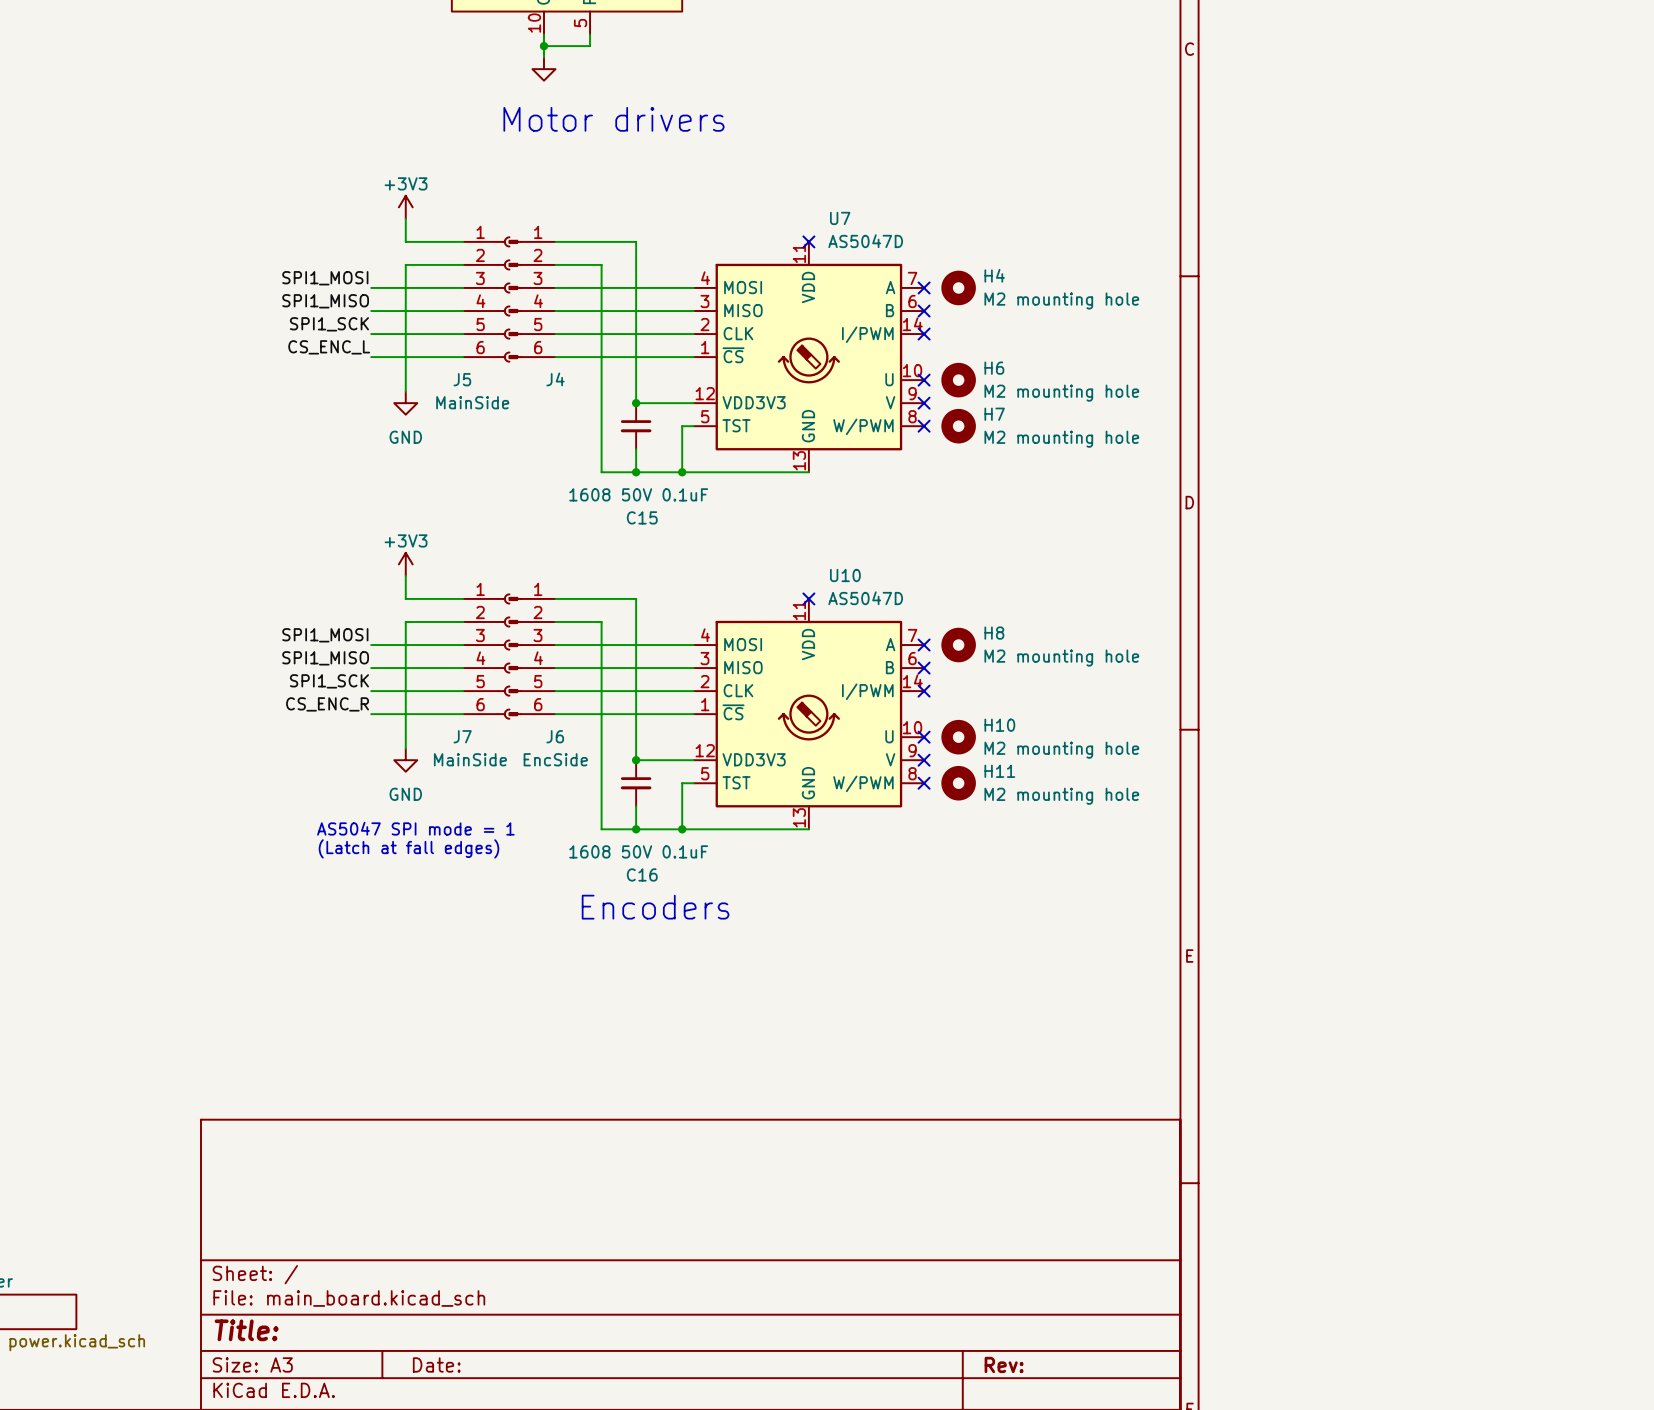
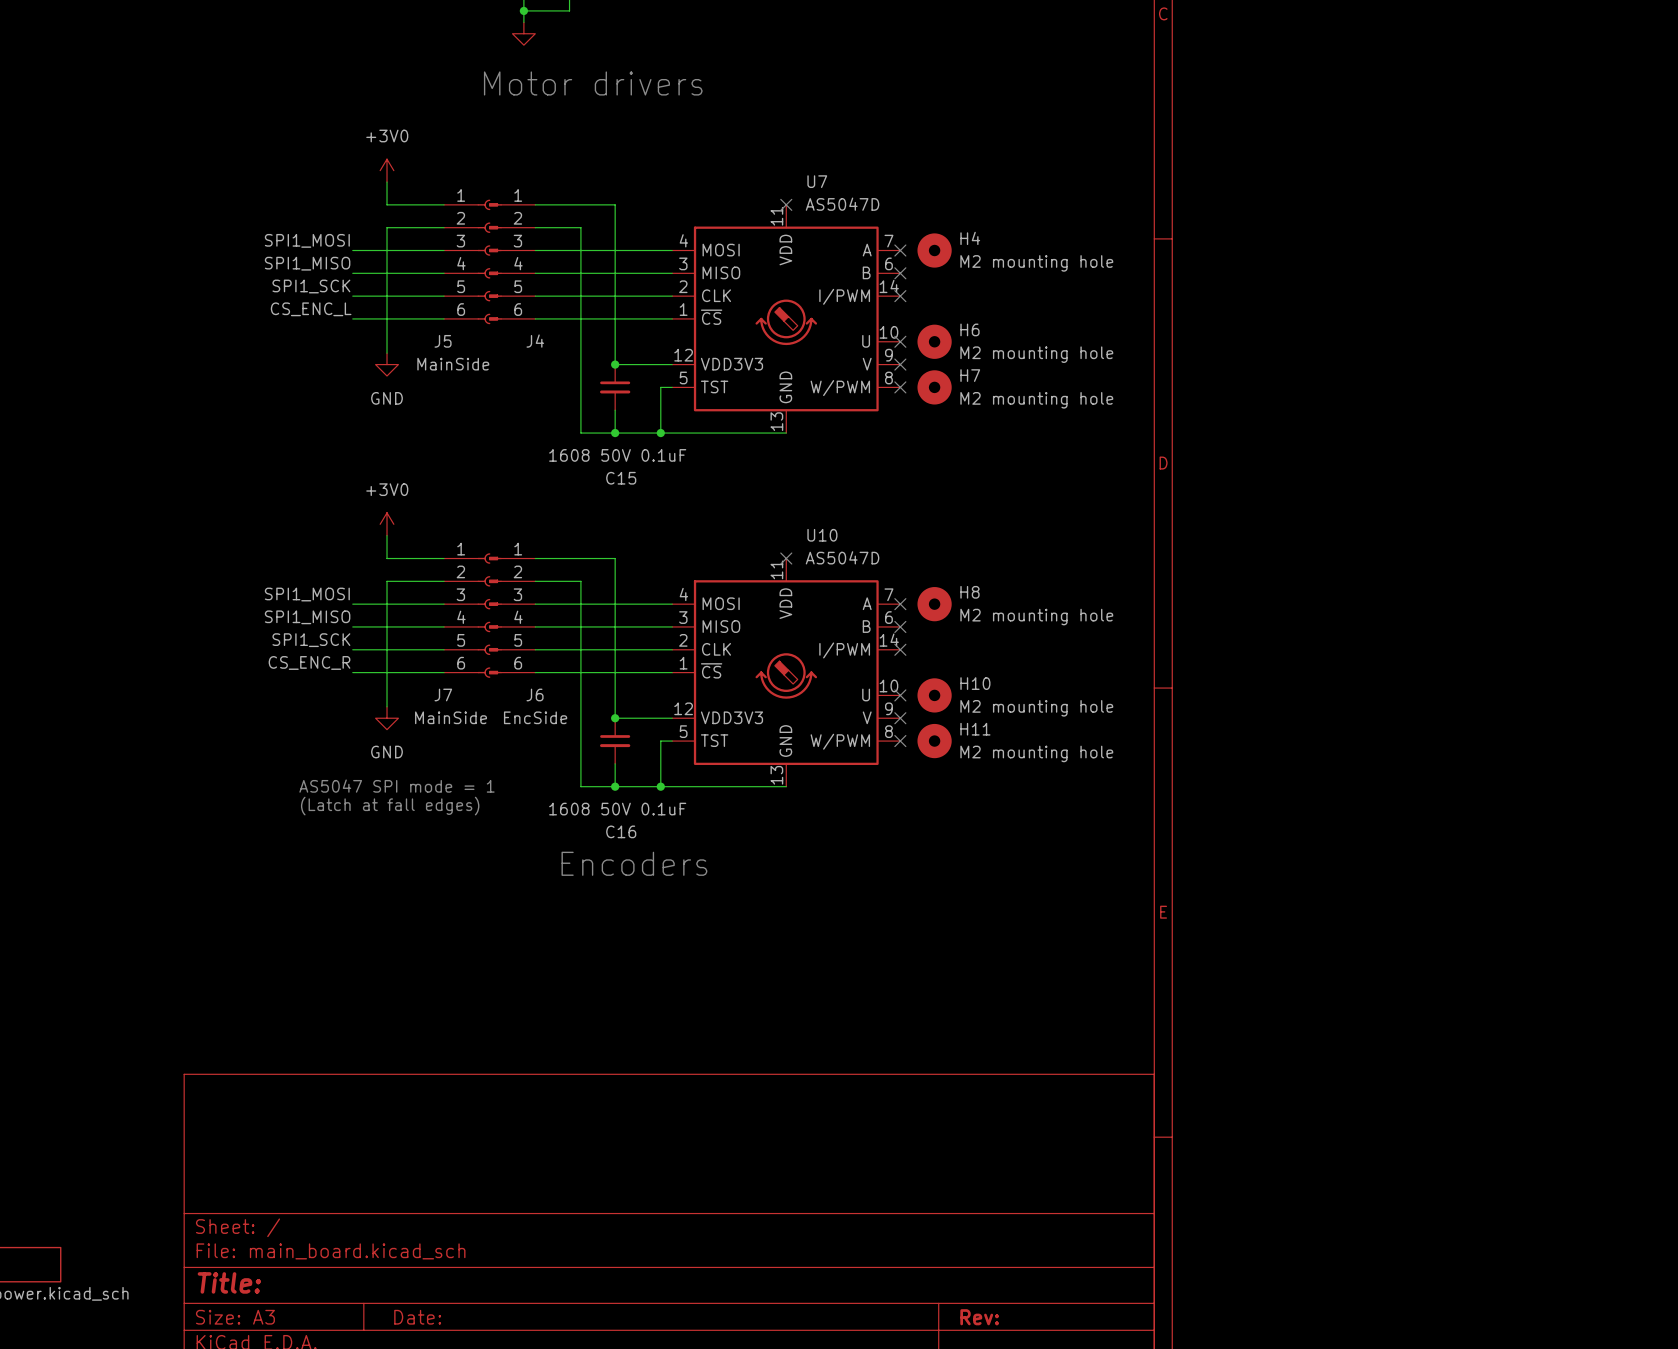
power symbol: +3V3 (405, 207) -> +3V0 (387, 170)
power symbol: +3V3 (405, 564) -> +3V0 (387, 524)

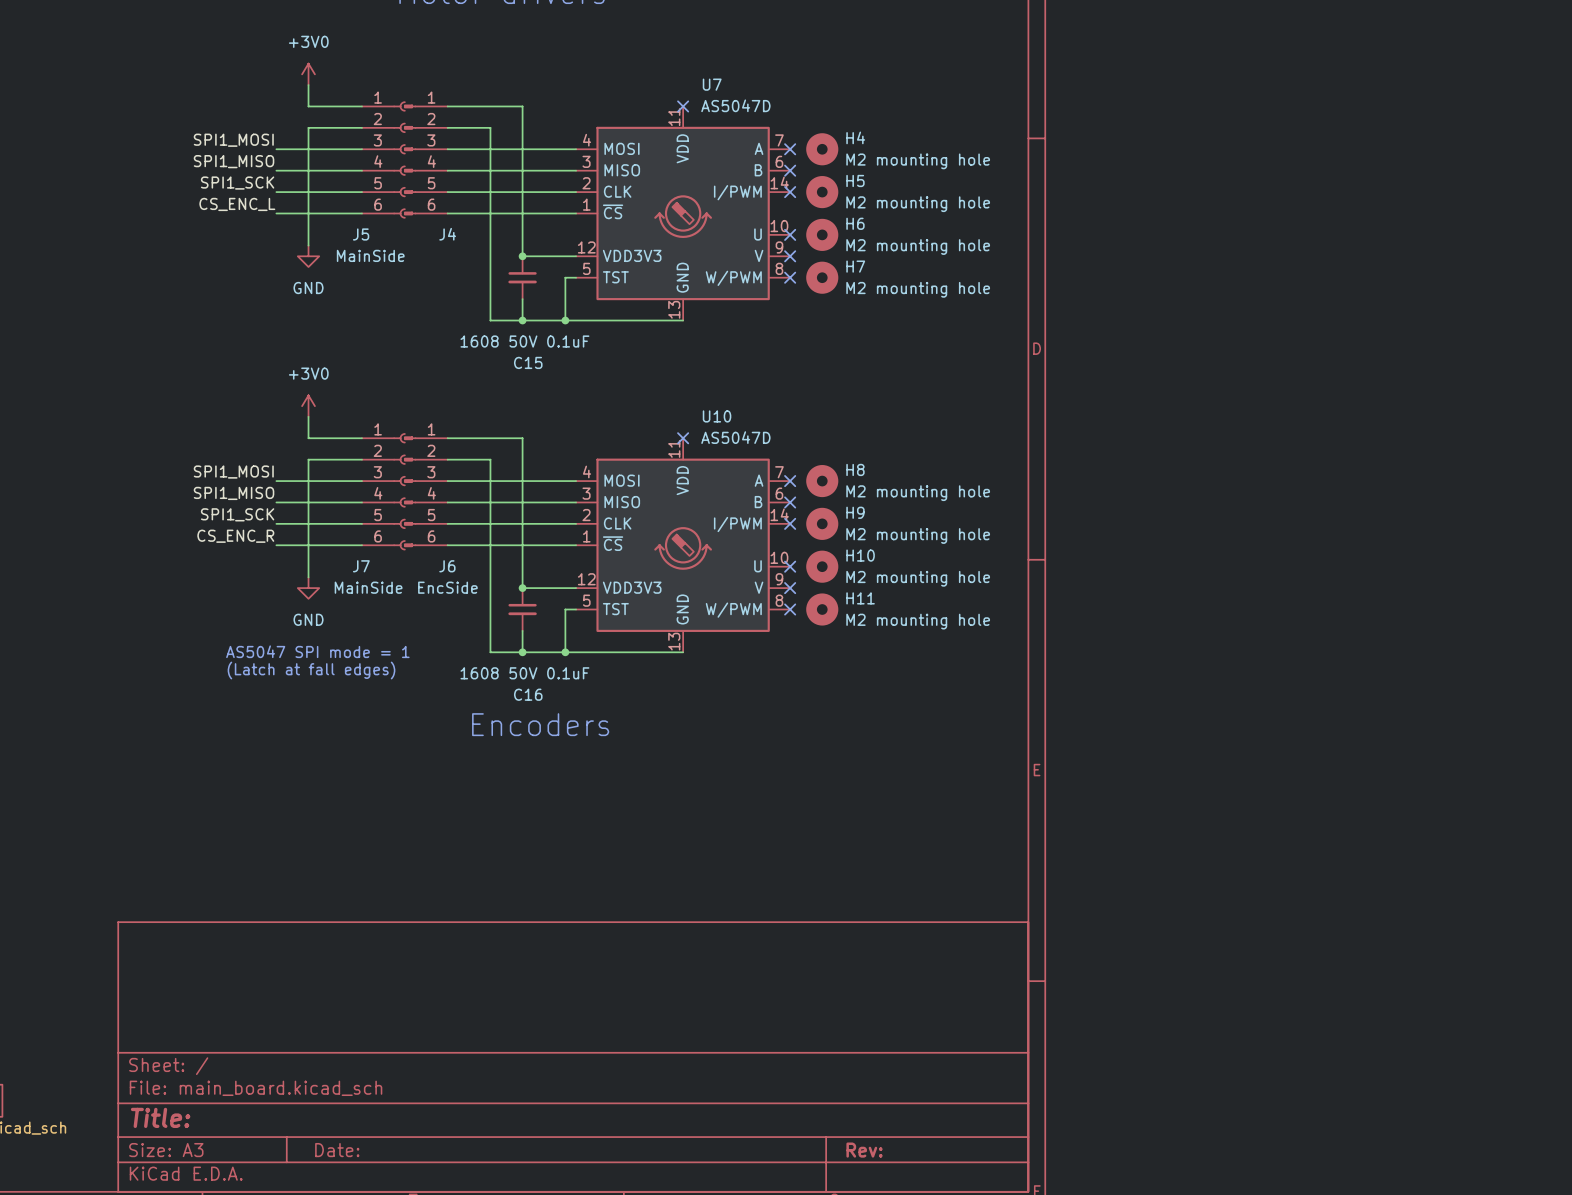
H5: none -> M2 mounting hole (822, 192)
H9: none -> M2 mounting hole (822, 523)

